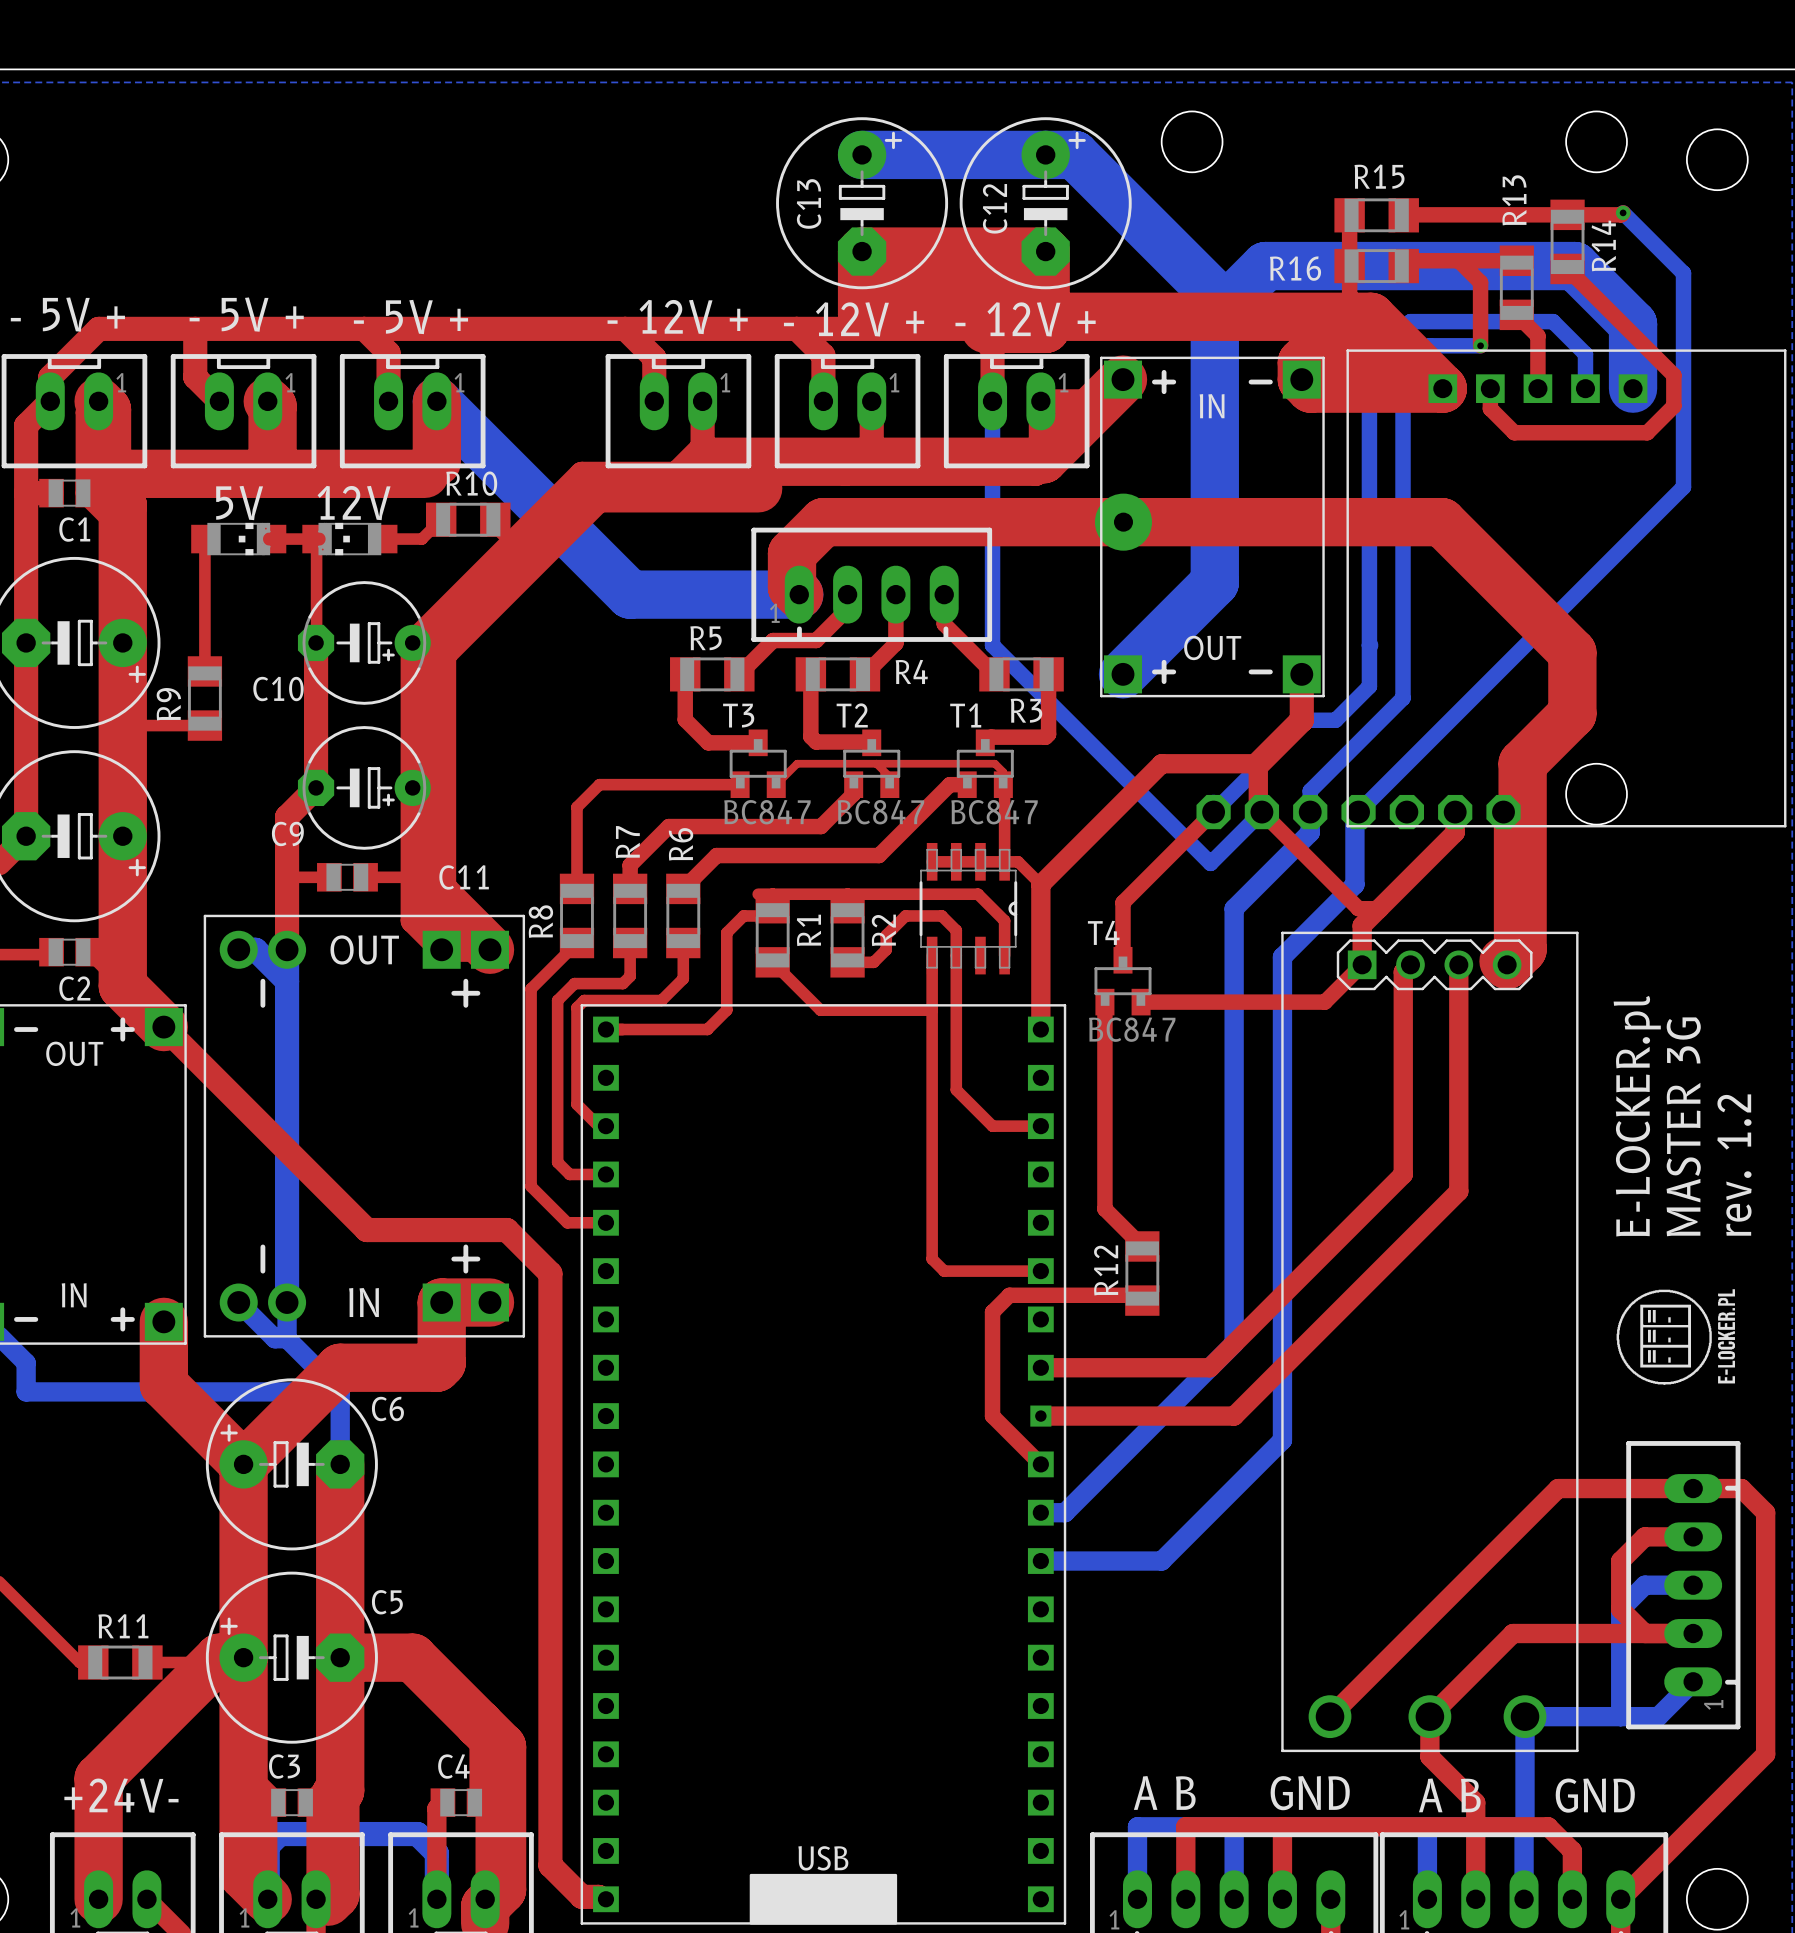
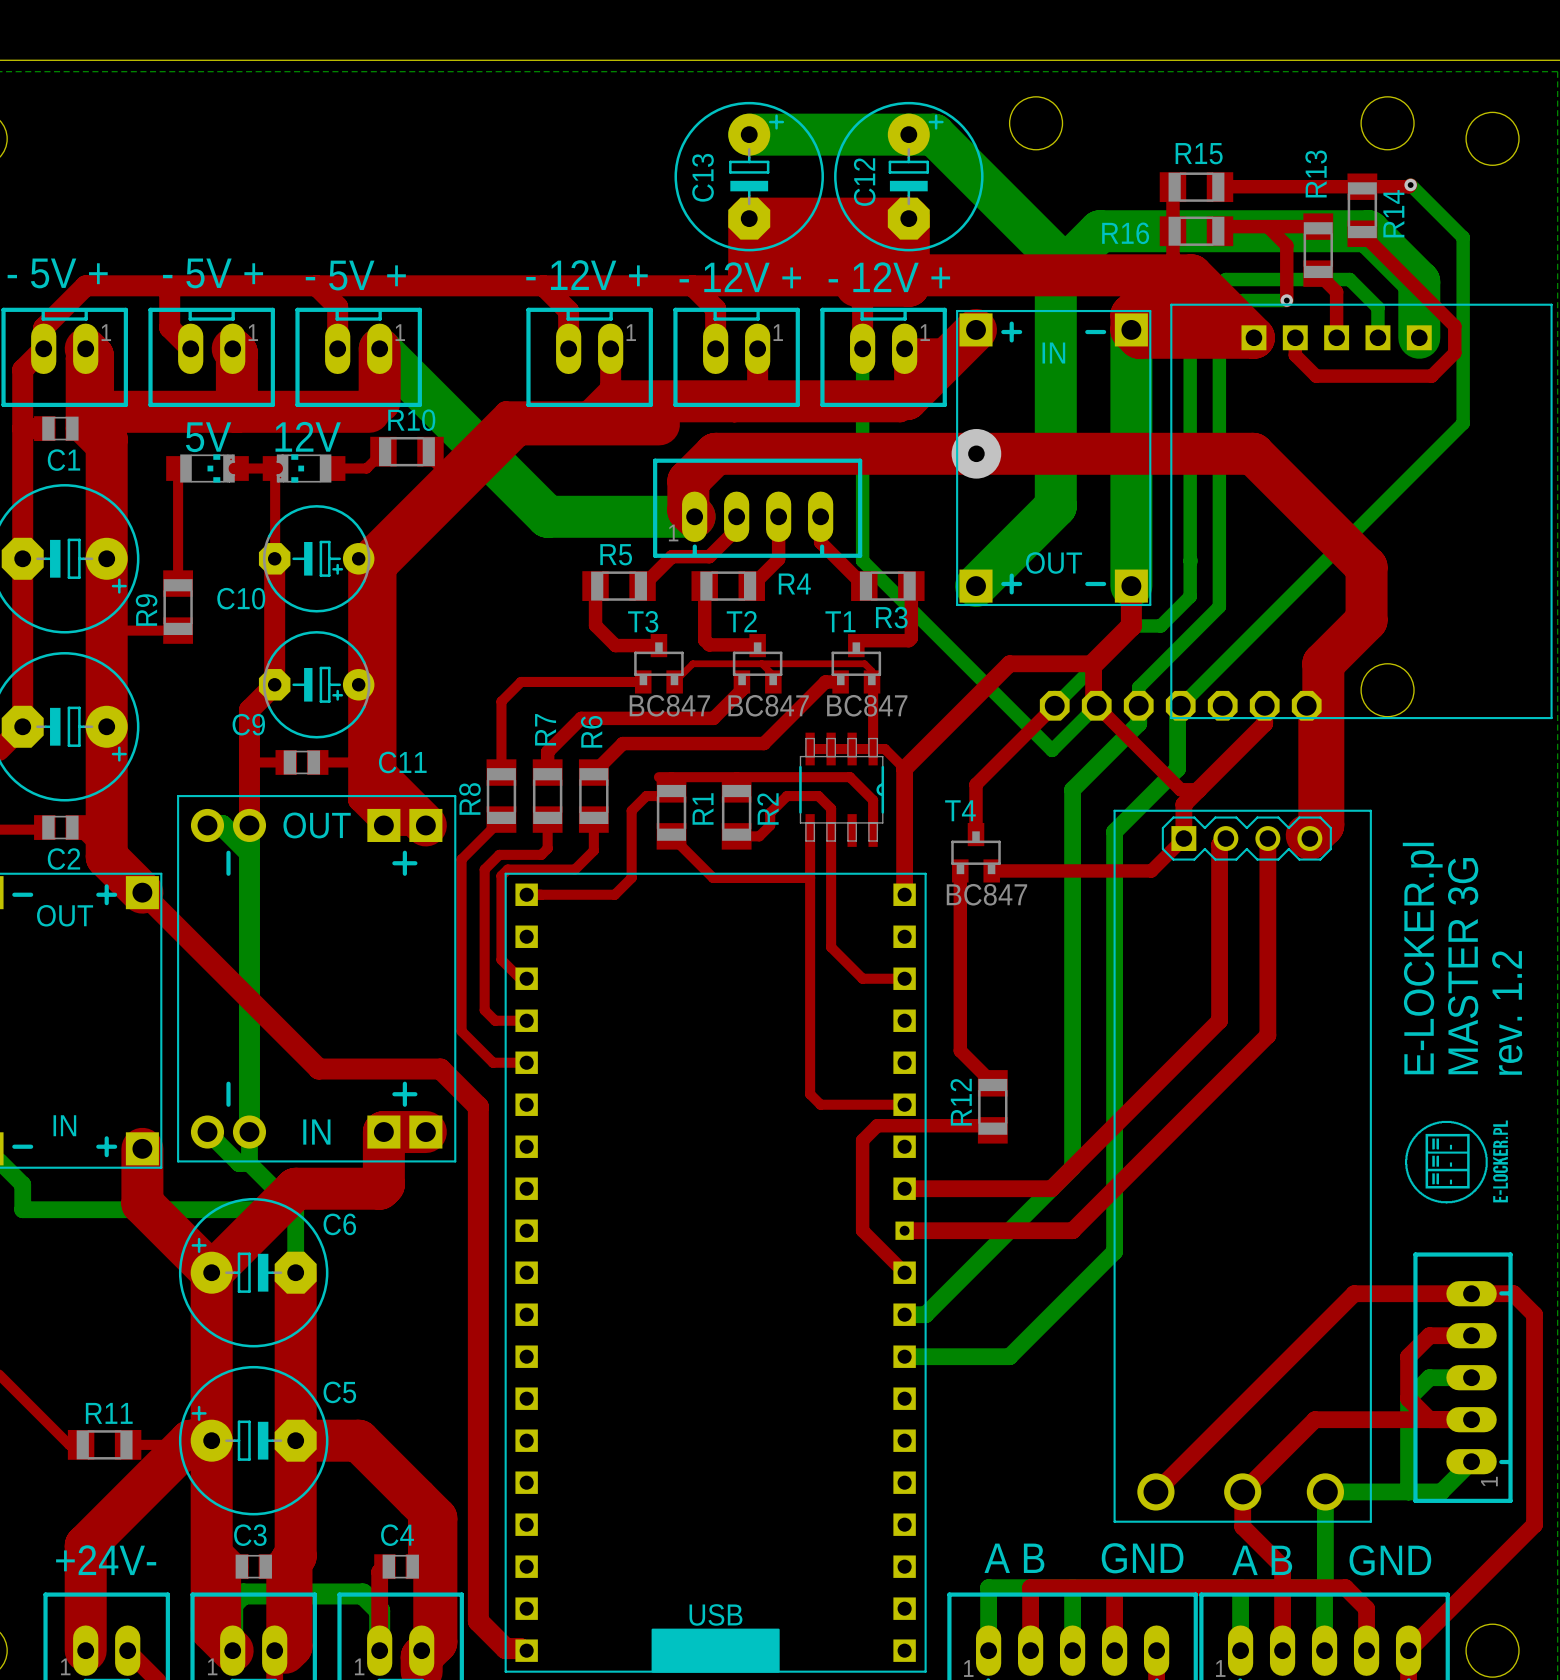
bottom track: none -> (1131, 329) (1131, 586)

